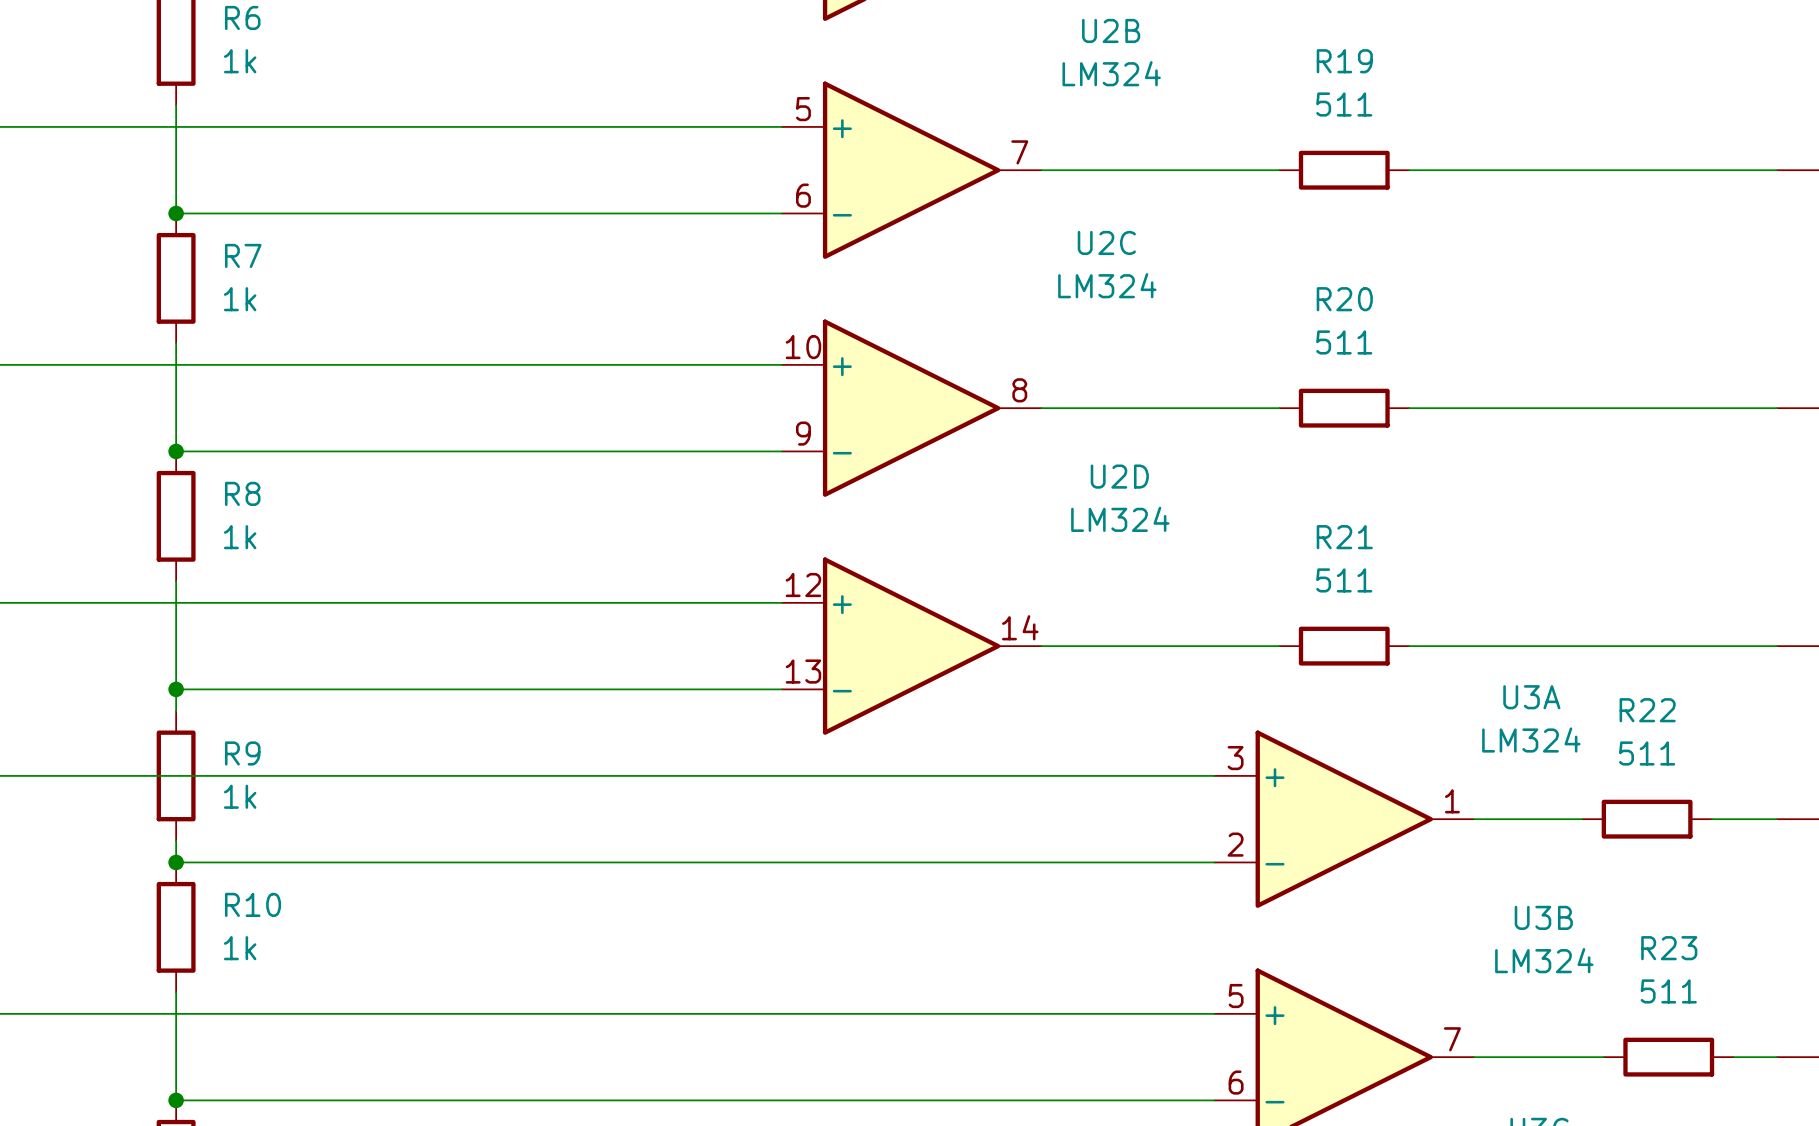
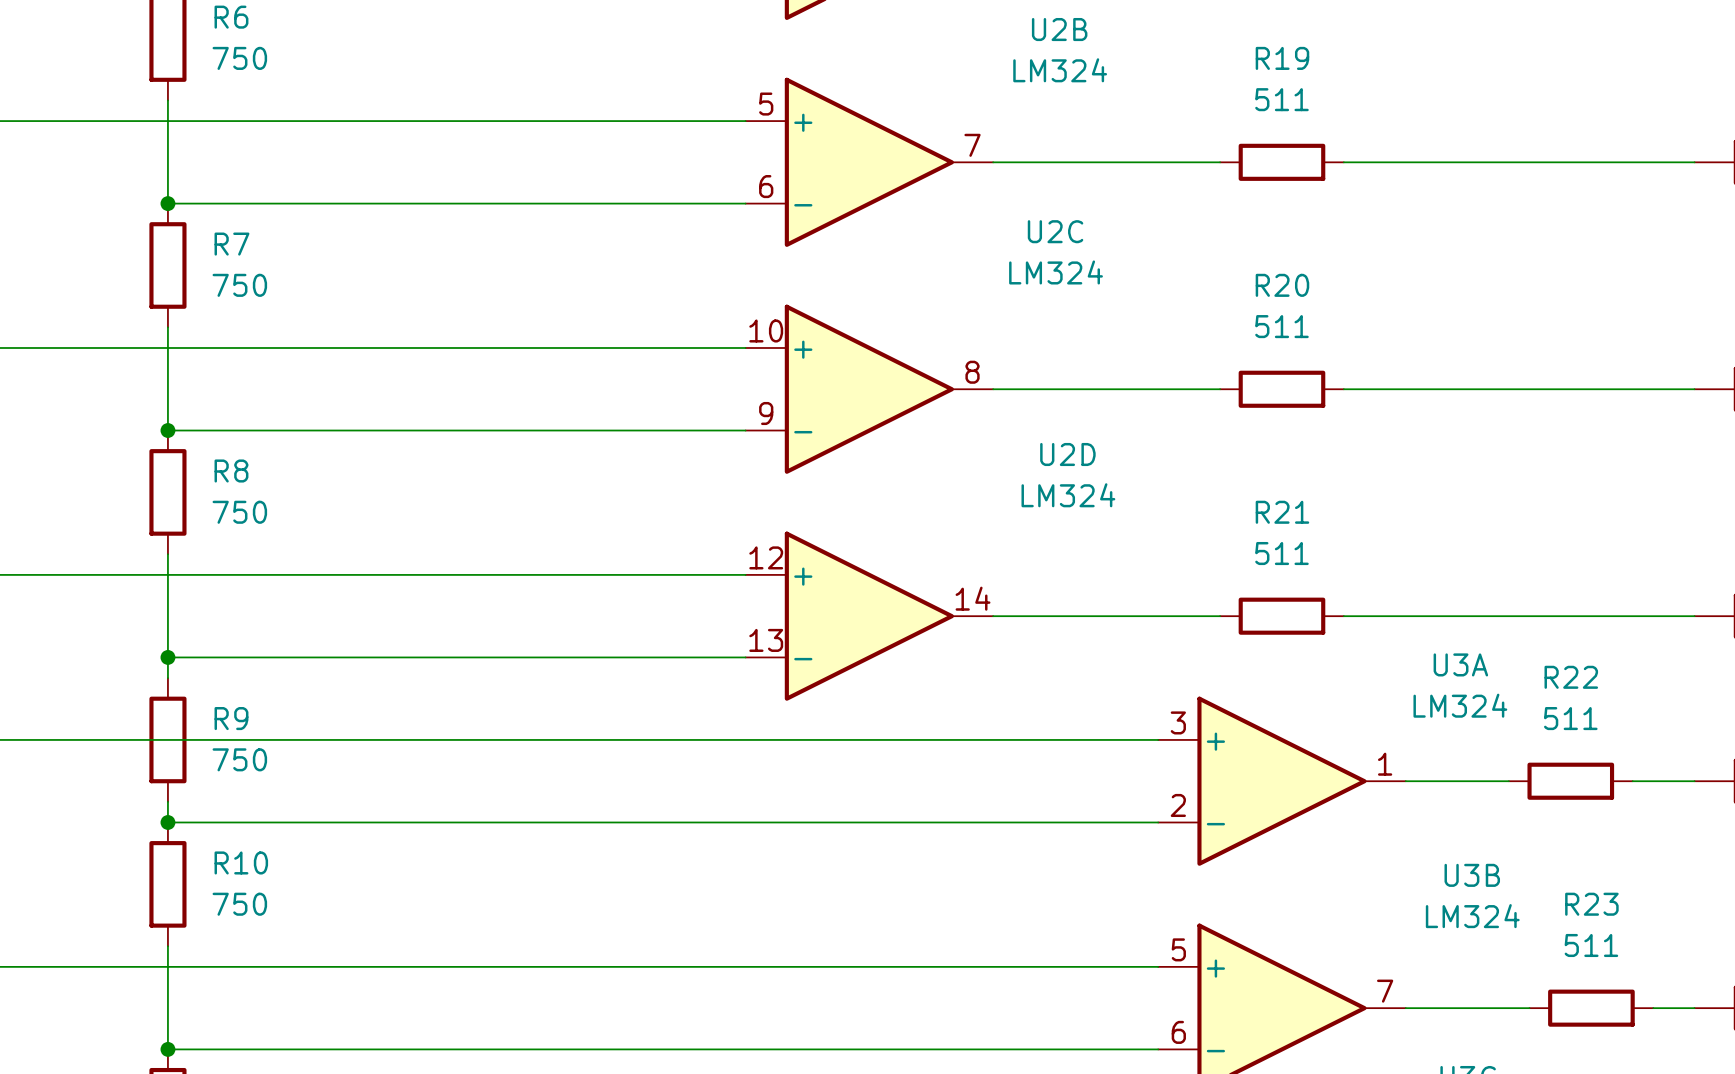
R6 value: 1k (240, 61) -> 750 (239, 58)
R7 value: 1k (240, 299) -> 750 (239, 285)
R8 value: 1k (240, 537) -> 750 (239, 512)
R9 value: 1k (240, 796) -> 750 (239, 759)
R10 value: 1k (240, 948) -> 750 (239, 904)

